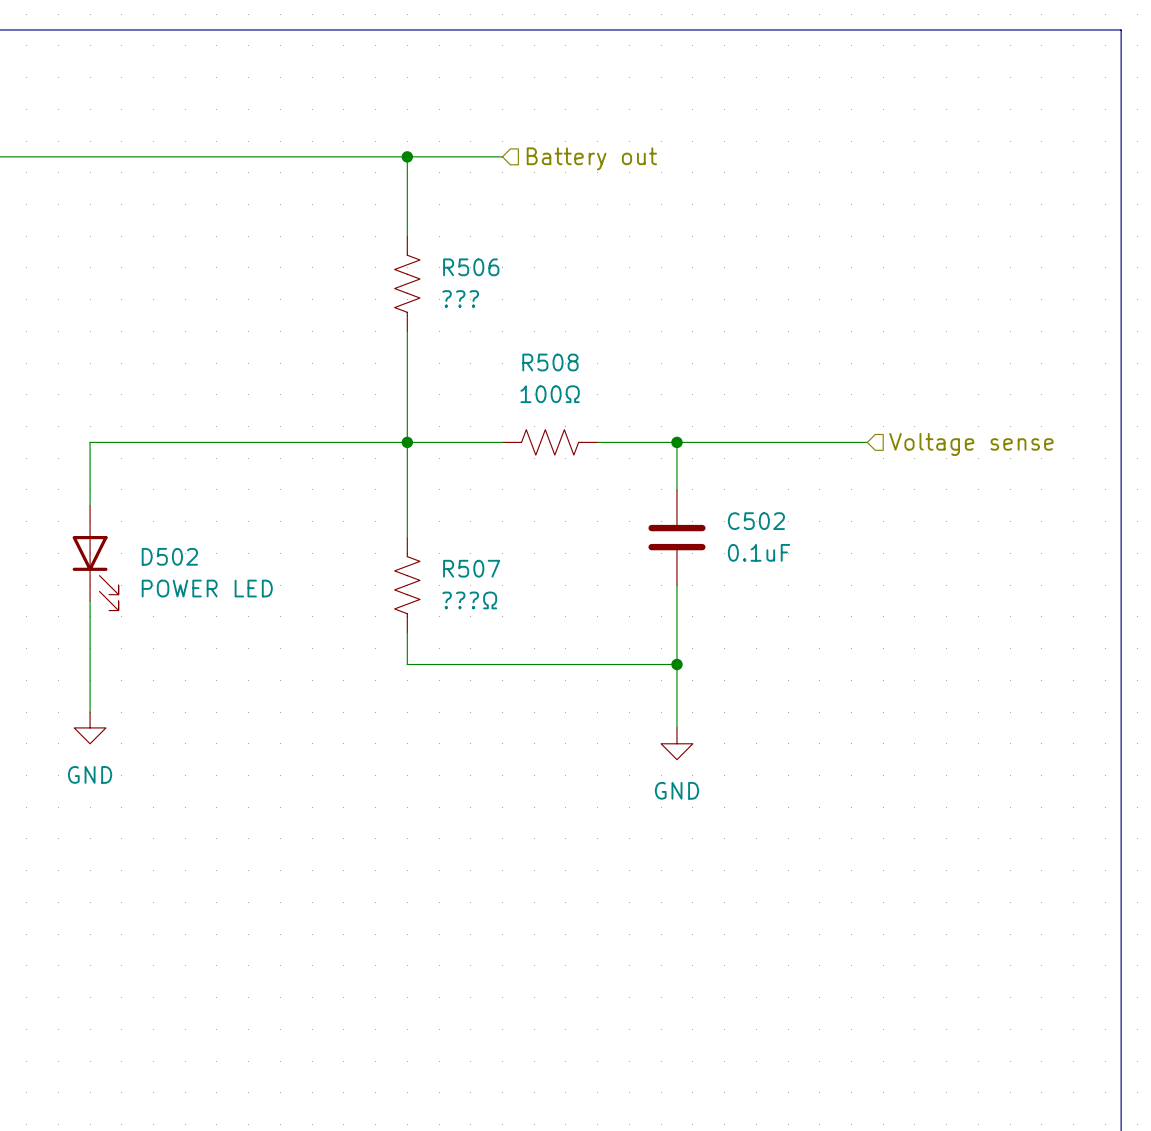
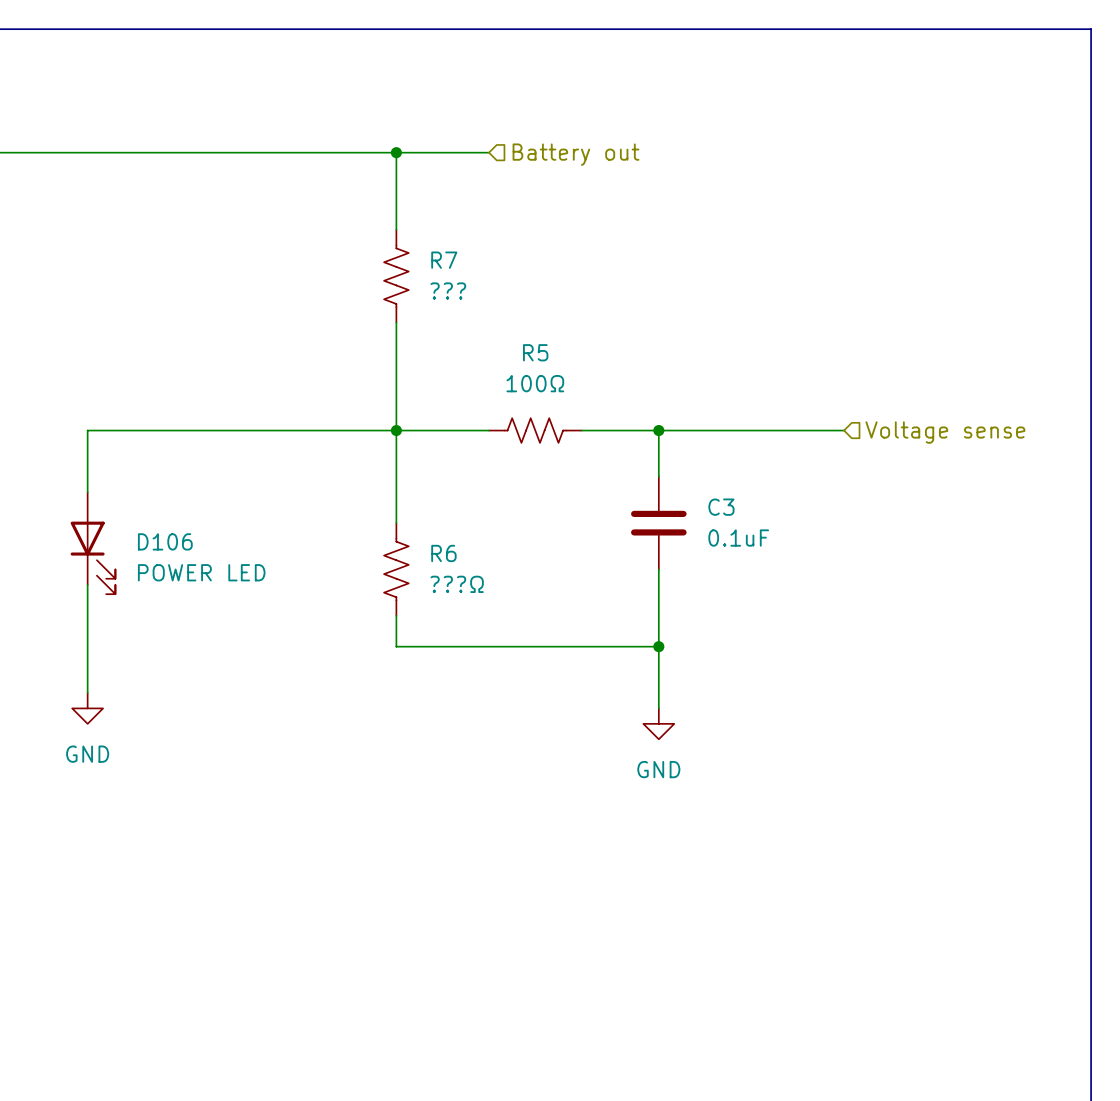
R506 name: R506 (471, 267) -> R7 (444, 260)
R508 name: R508 (550, 362) -> R5 (535, 352)
C502 name: C502 (756, 521) -> C3 (721, 507)
D502 name: D502 (169, 556) -> D106 (165, 541)
R507 name: R507 (471, 568) -> R6 (443, 553)

